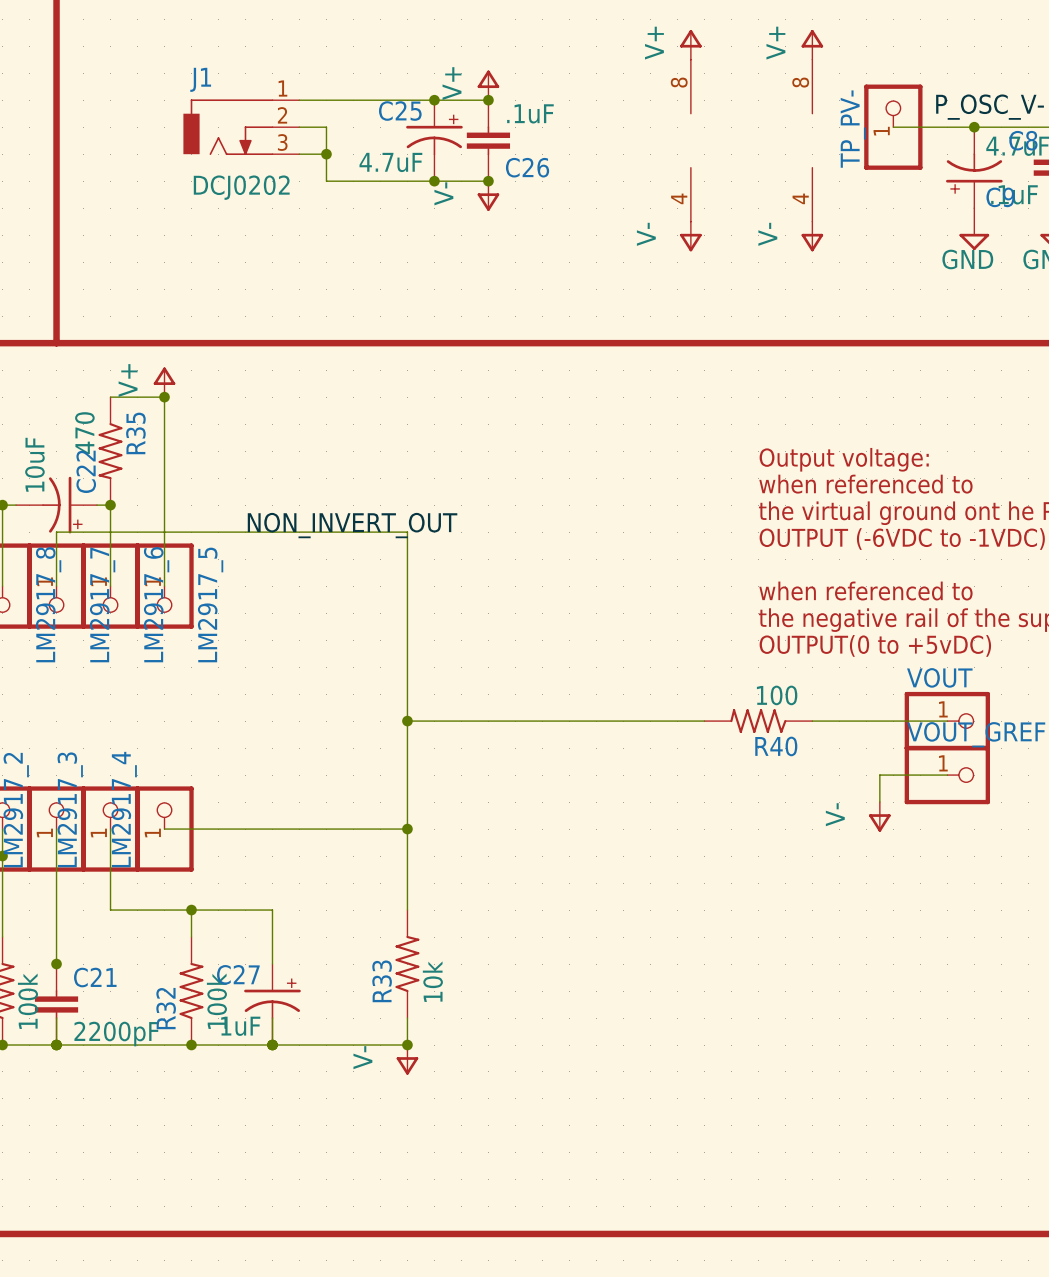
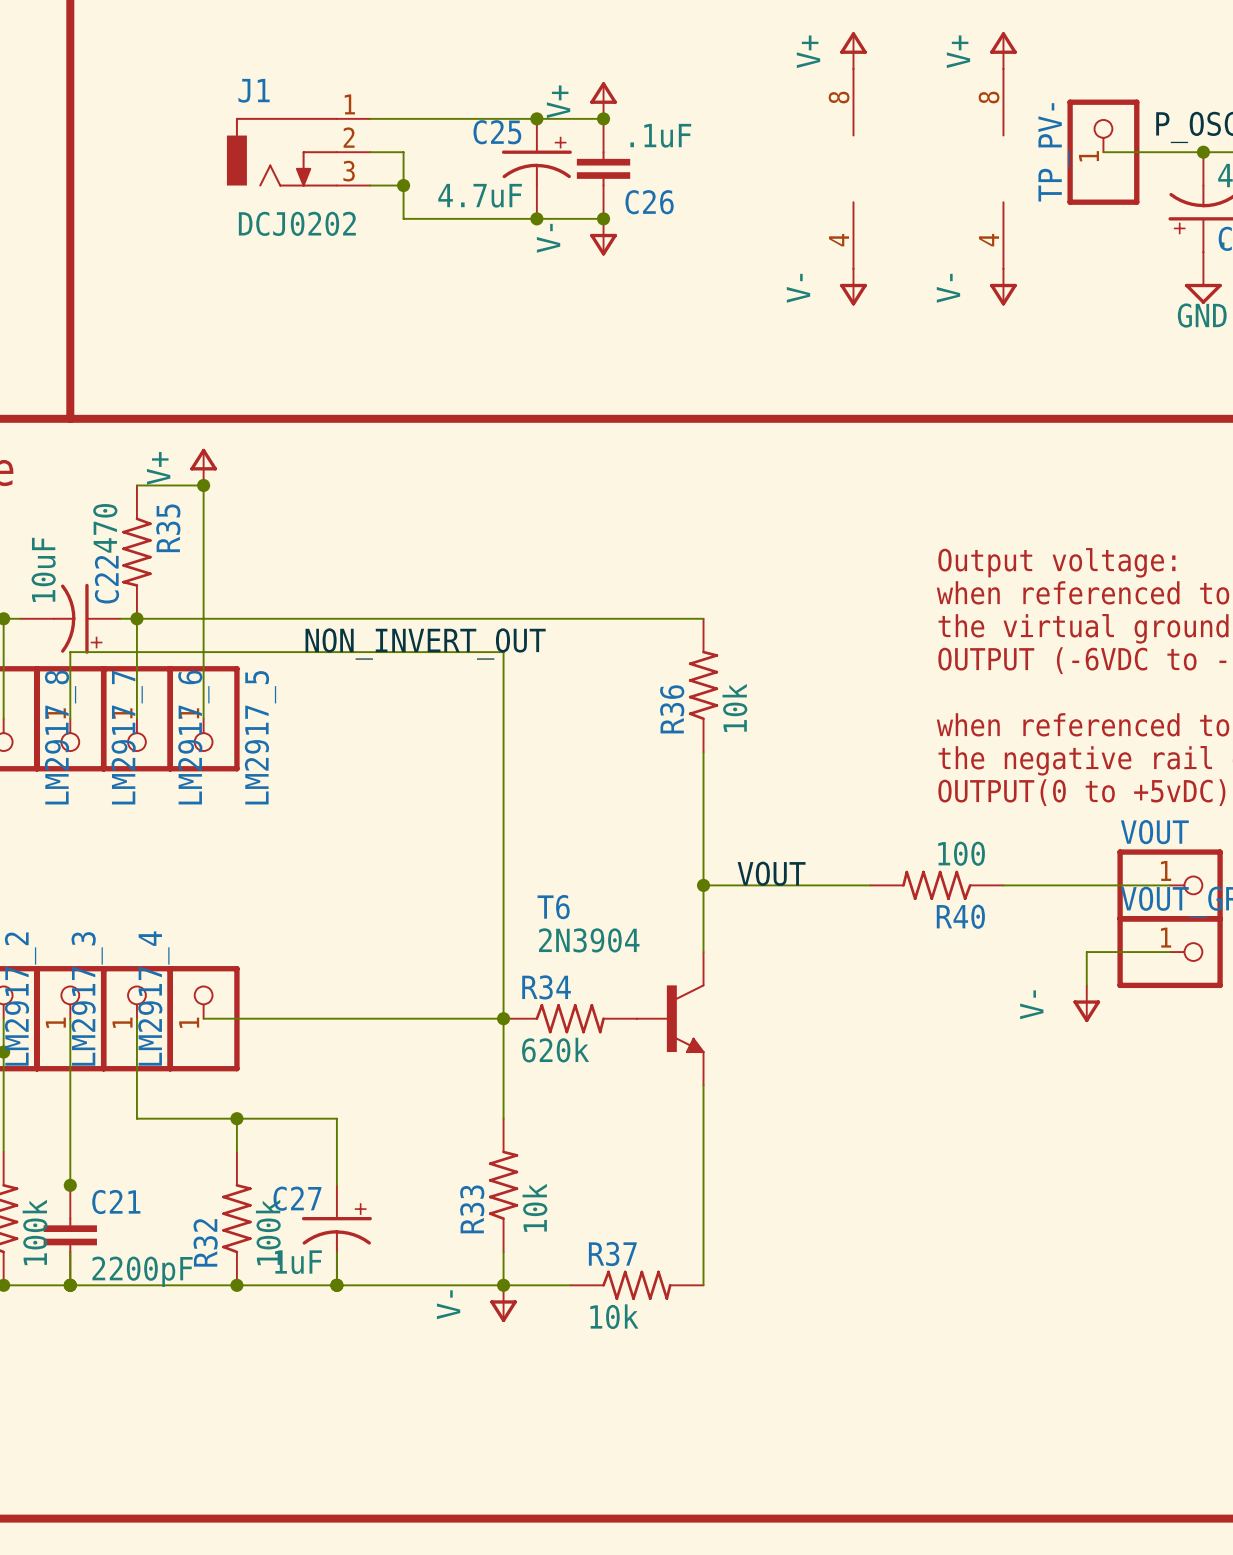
wire: none -> (136, 618) (703, 618)
R36: none -> 10k (703, 685)
wire: none -> (703, 752) (703, 952)
label: none -> VOUT (771, 873)
wire: (407, 721) (569, 721) -> none
junction: (407, 721) -> none
junction: none -> (703, 885)
R34: none -> 620k (570, 1018)
T6: none -> 2N3904 (670, 1018)
wire: none -> (703, 1085) (703, 1285)
wire: none -> (503, 1285) (570, 1285)
R37: none -> 10k (636, 1285)

